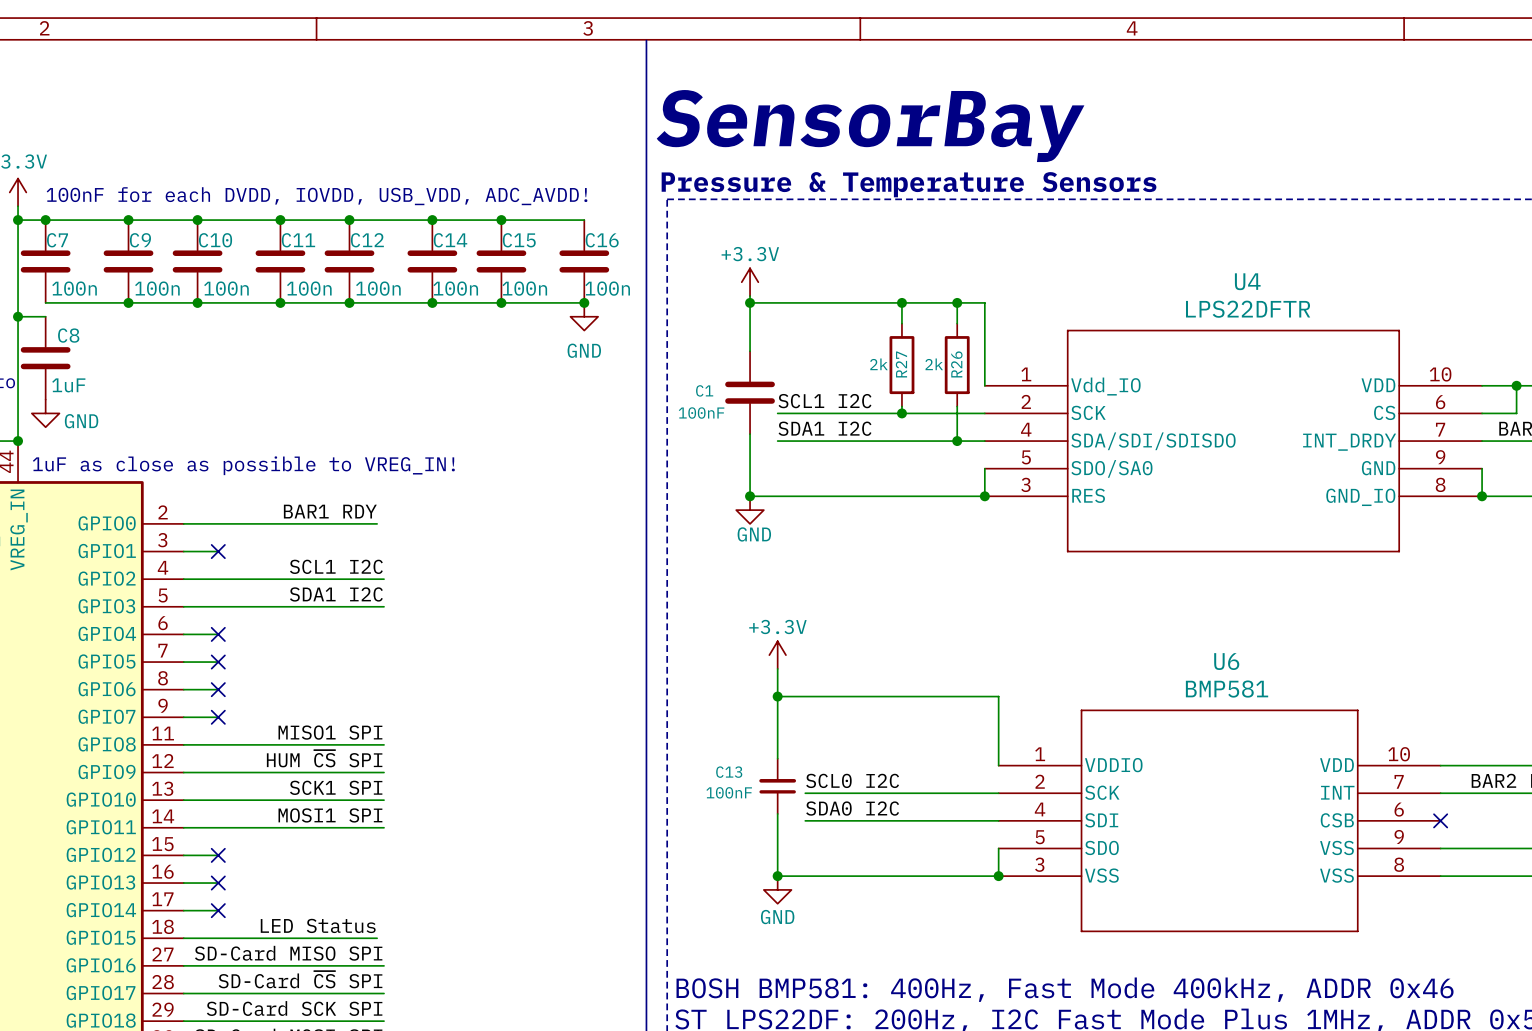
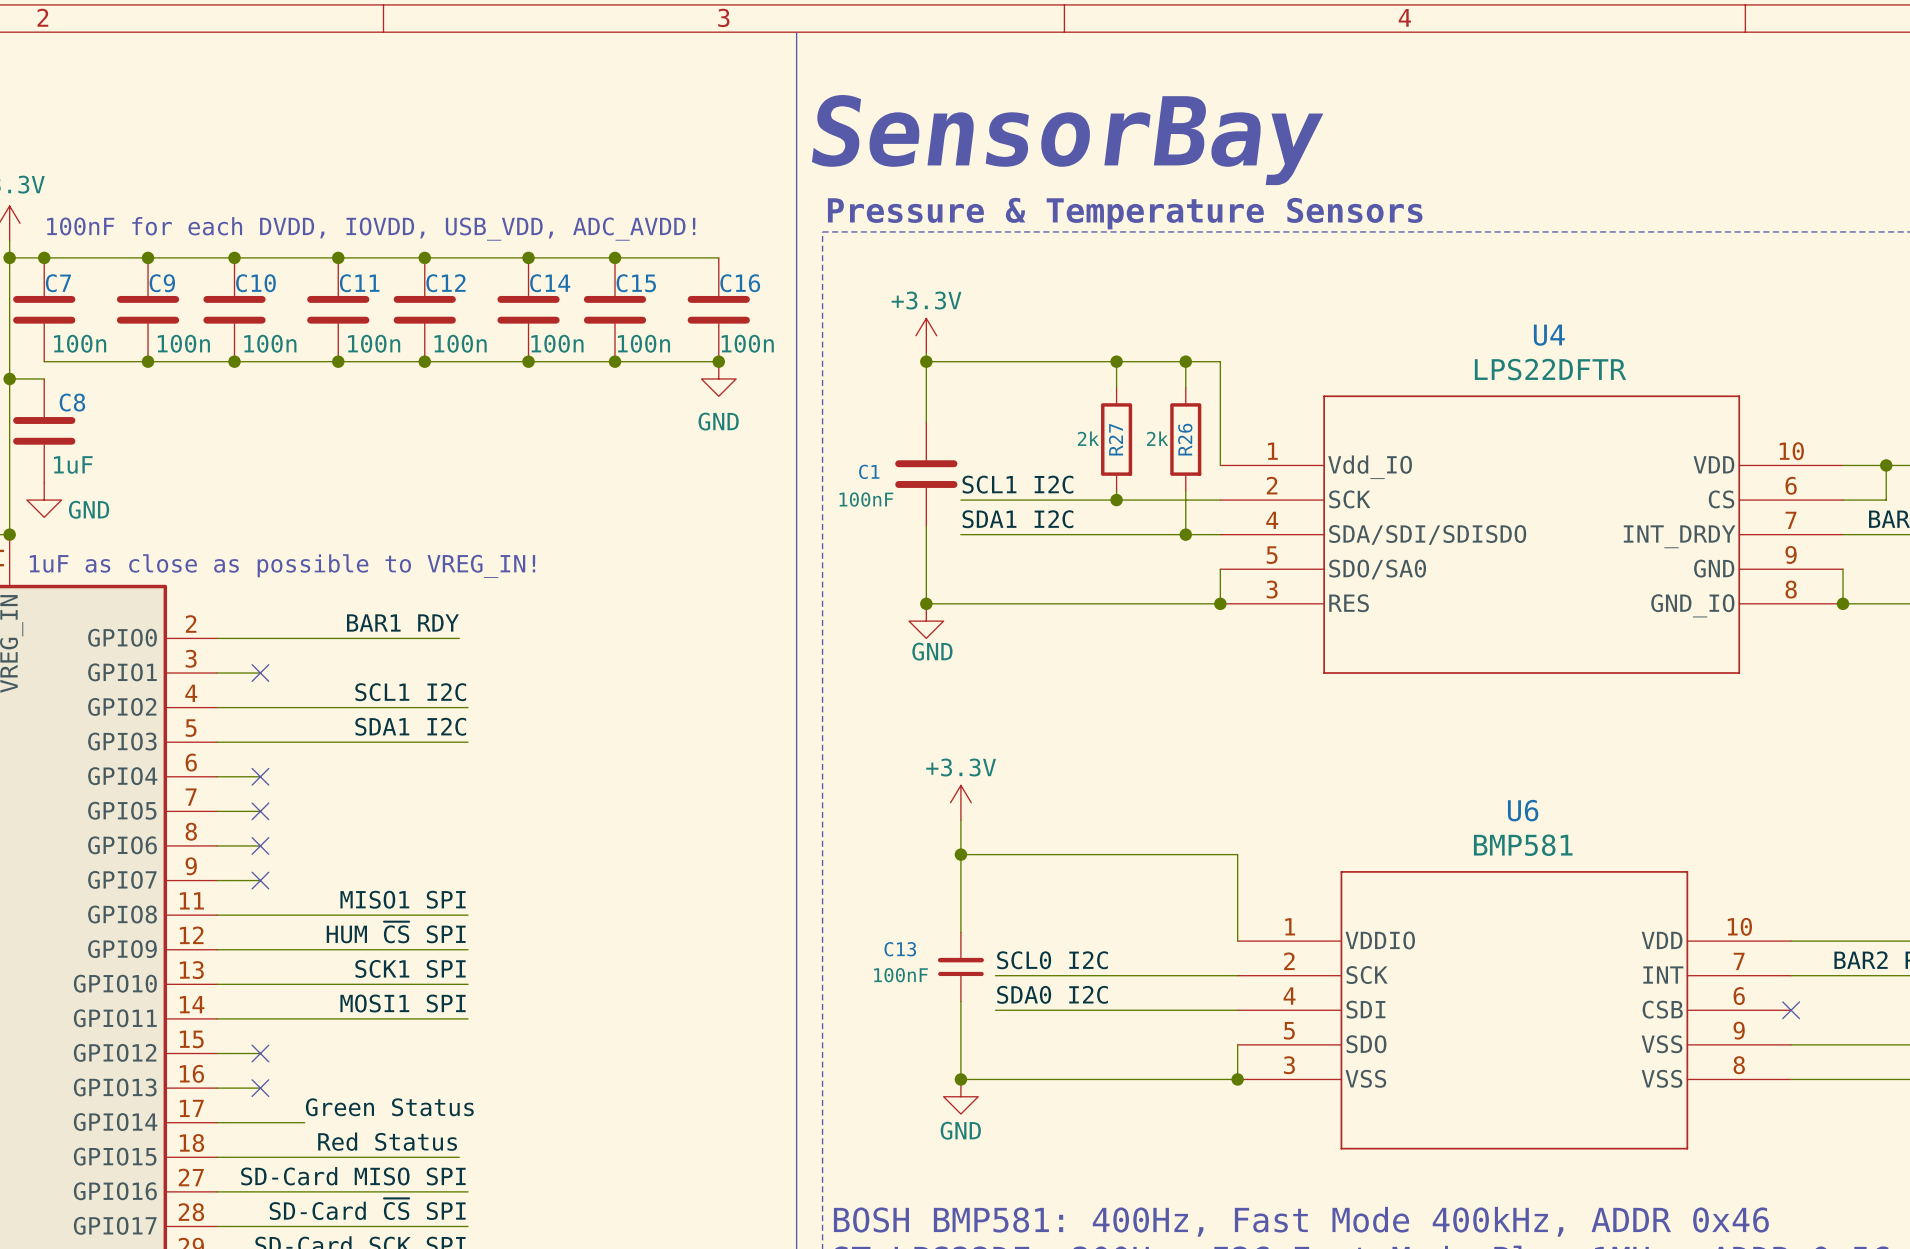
label: none -> Green Status (389, 1107)
wire: none -> (260, 1122) (304, 1122)
no-connect mark: (218, 910) -> none
label: LED Status (318, 925) -> Red Status (387, 1141)

